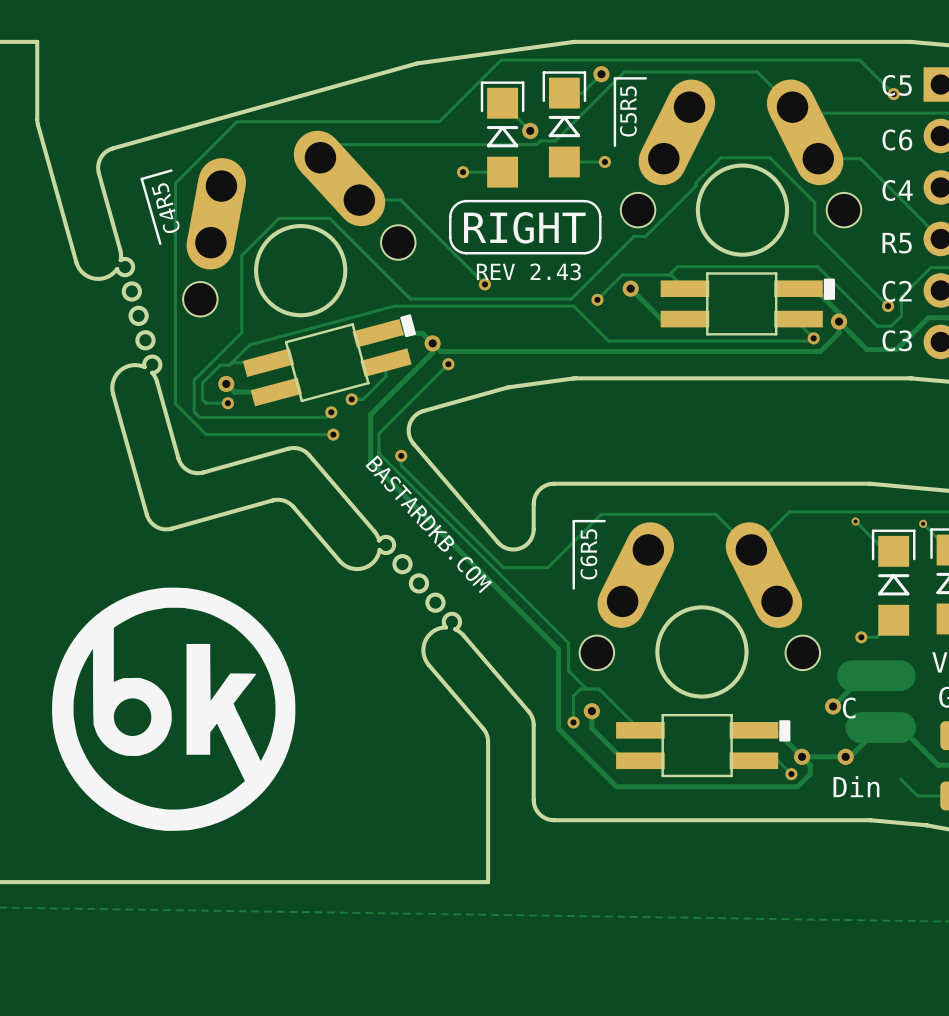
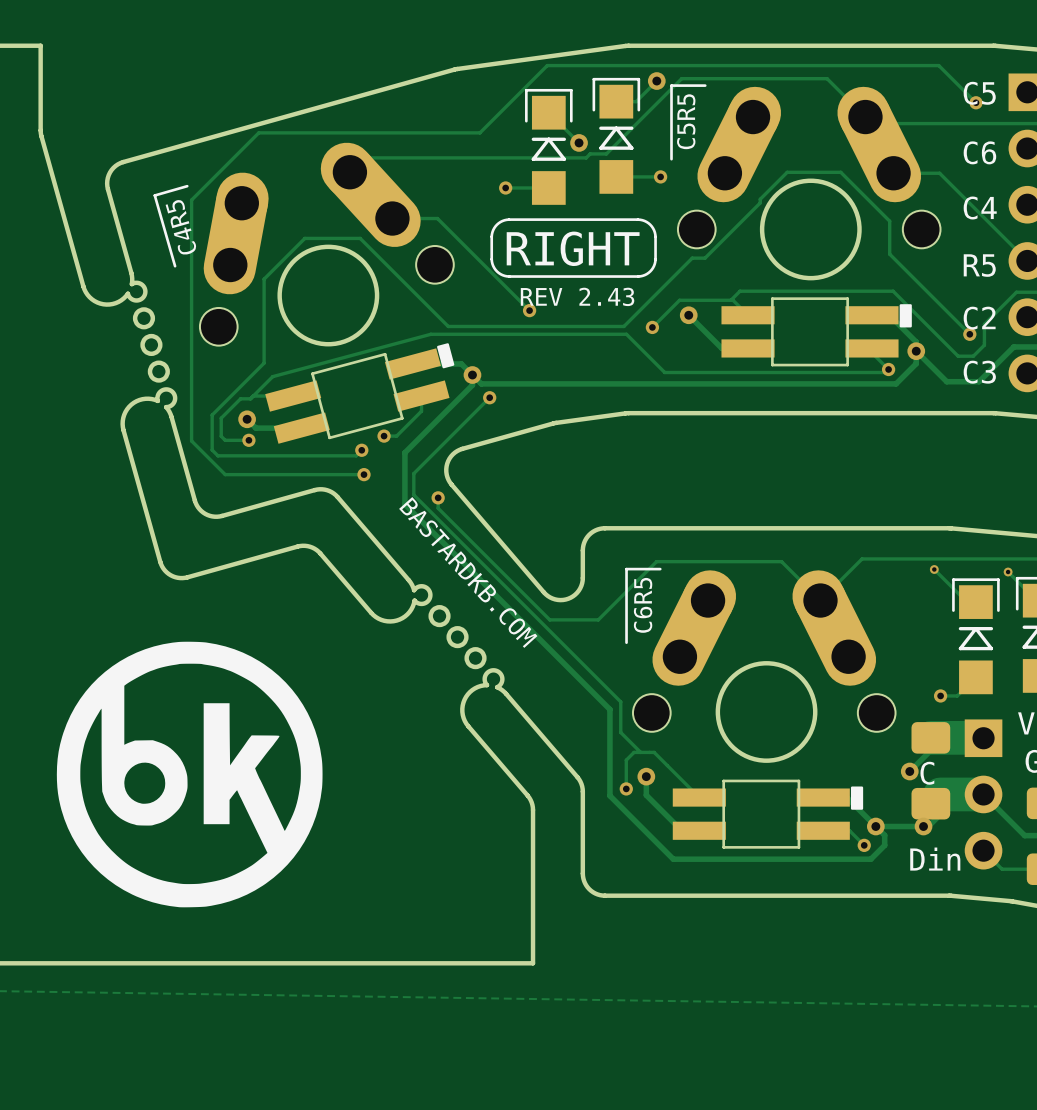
part: none -> (930, 770)
part: none -> (983, 794)

